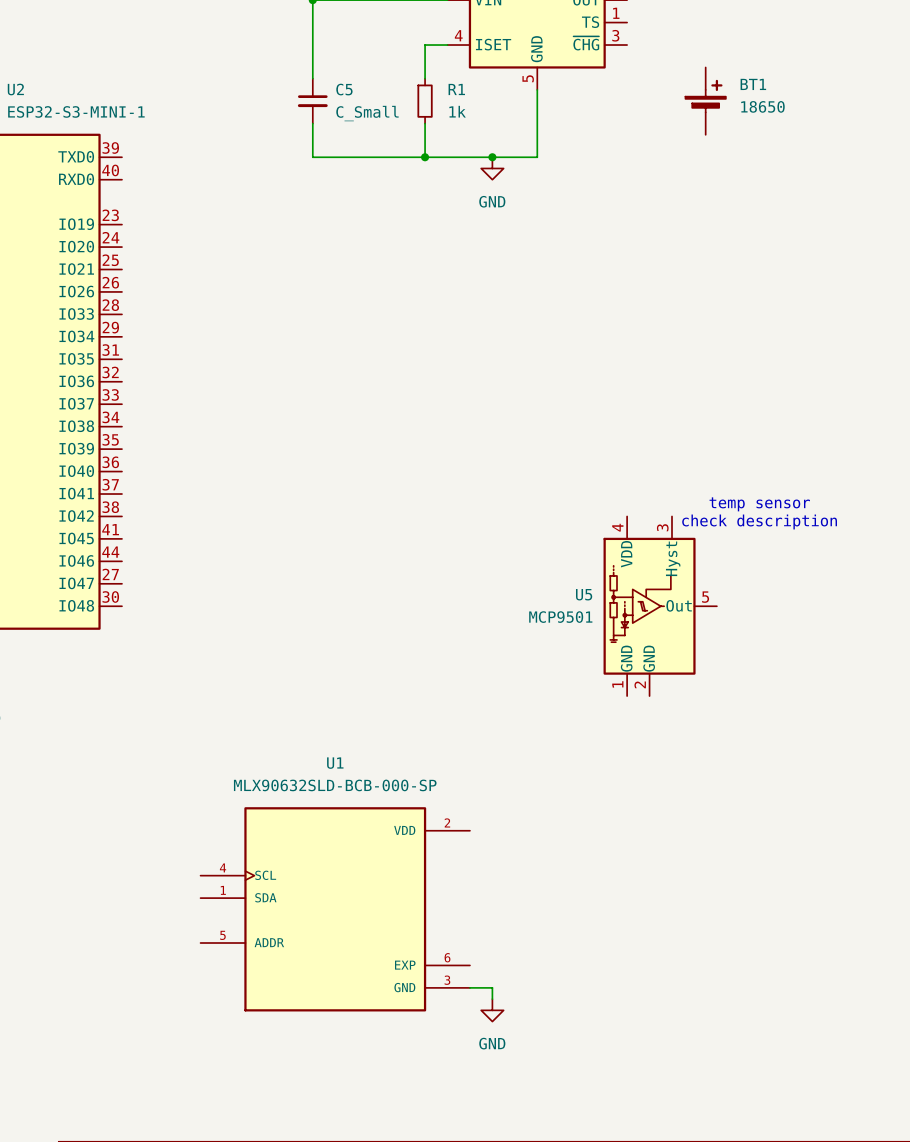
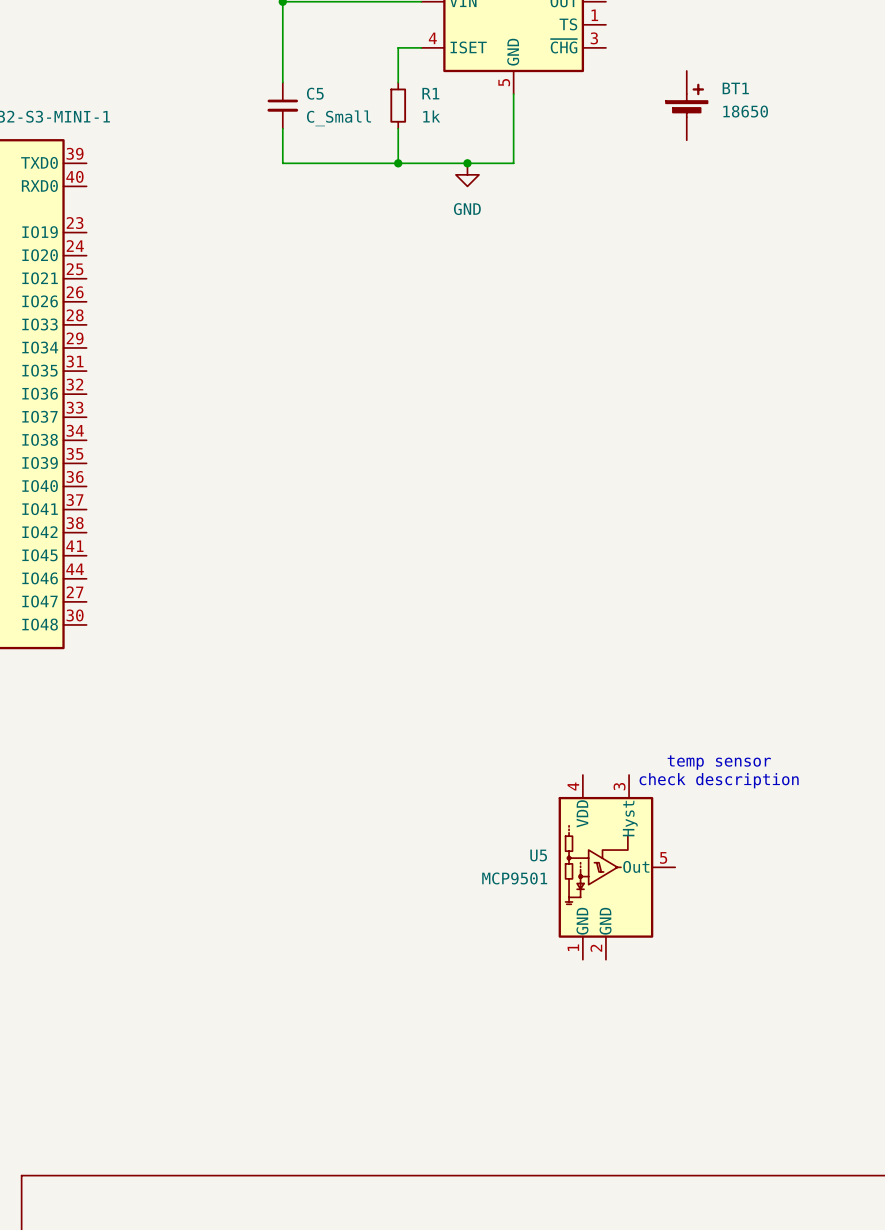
text: temp sensor (759, 504) -> none
text: check description (759, 521) -> none
U5 position: (660, 606) -> (616, 867)
text: none -> temp sensor (719, 762)
text: none -> check description (719, 780)
U1: MLX90632SLD-BCB-000-SP (335, 909) -> none
wire: (469, 987) (492, 987) (492, 999) -> none
power symbol: GND (492, 1010) -> none

